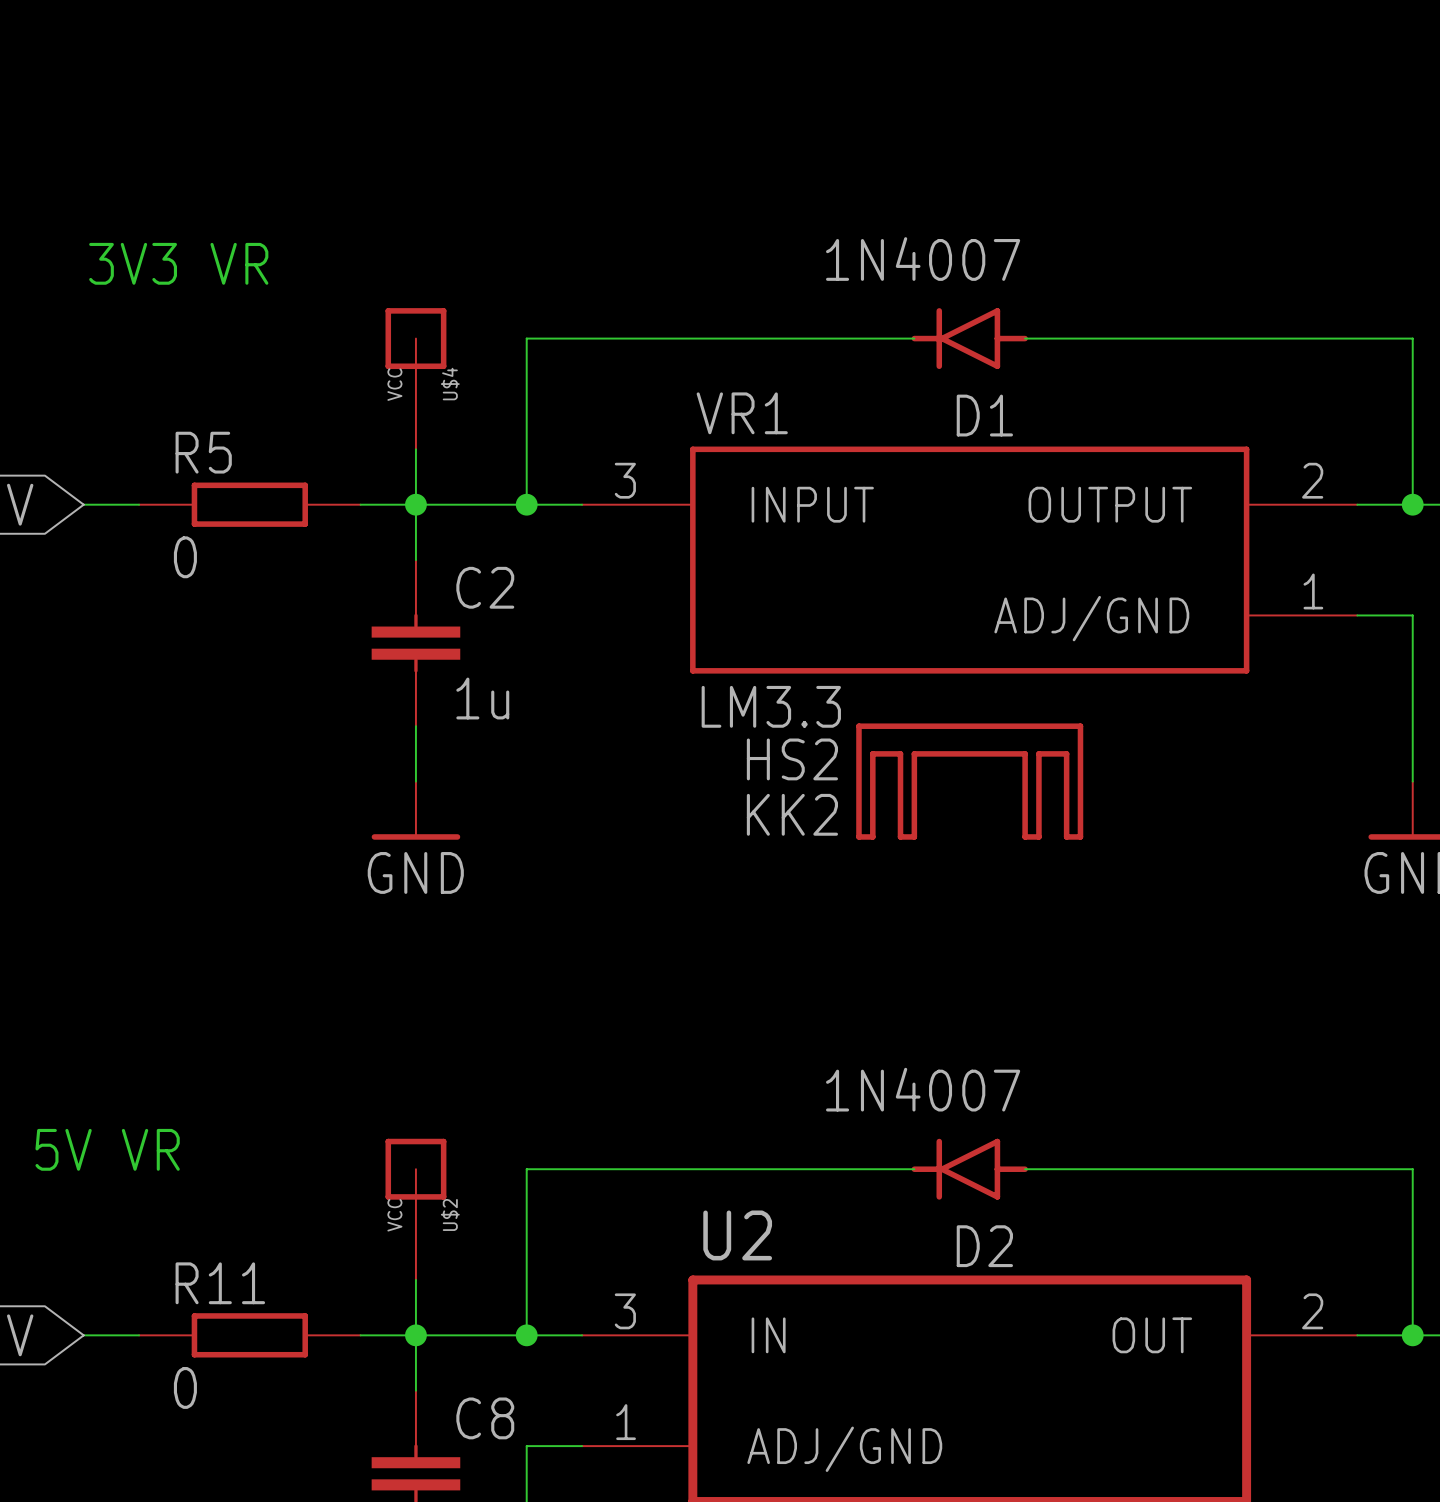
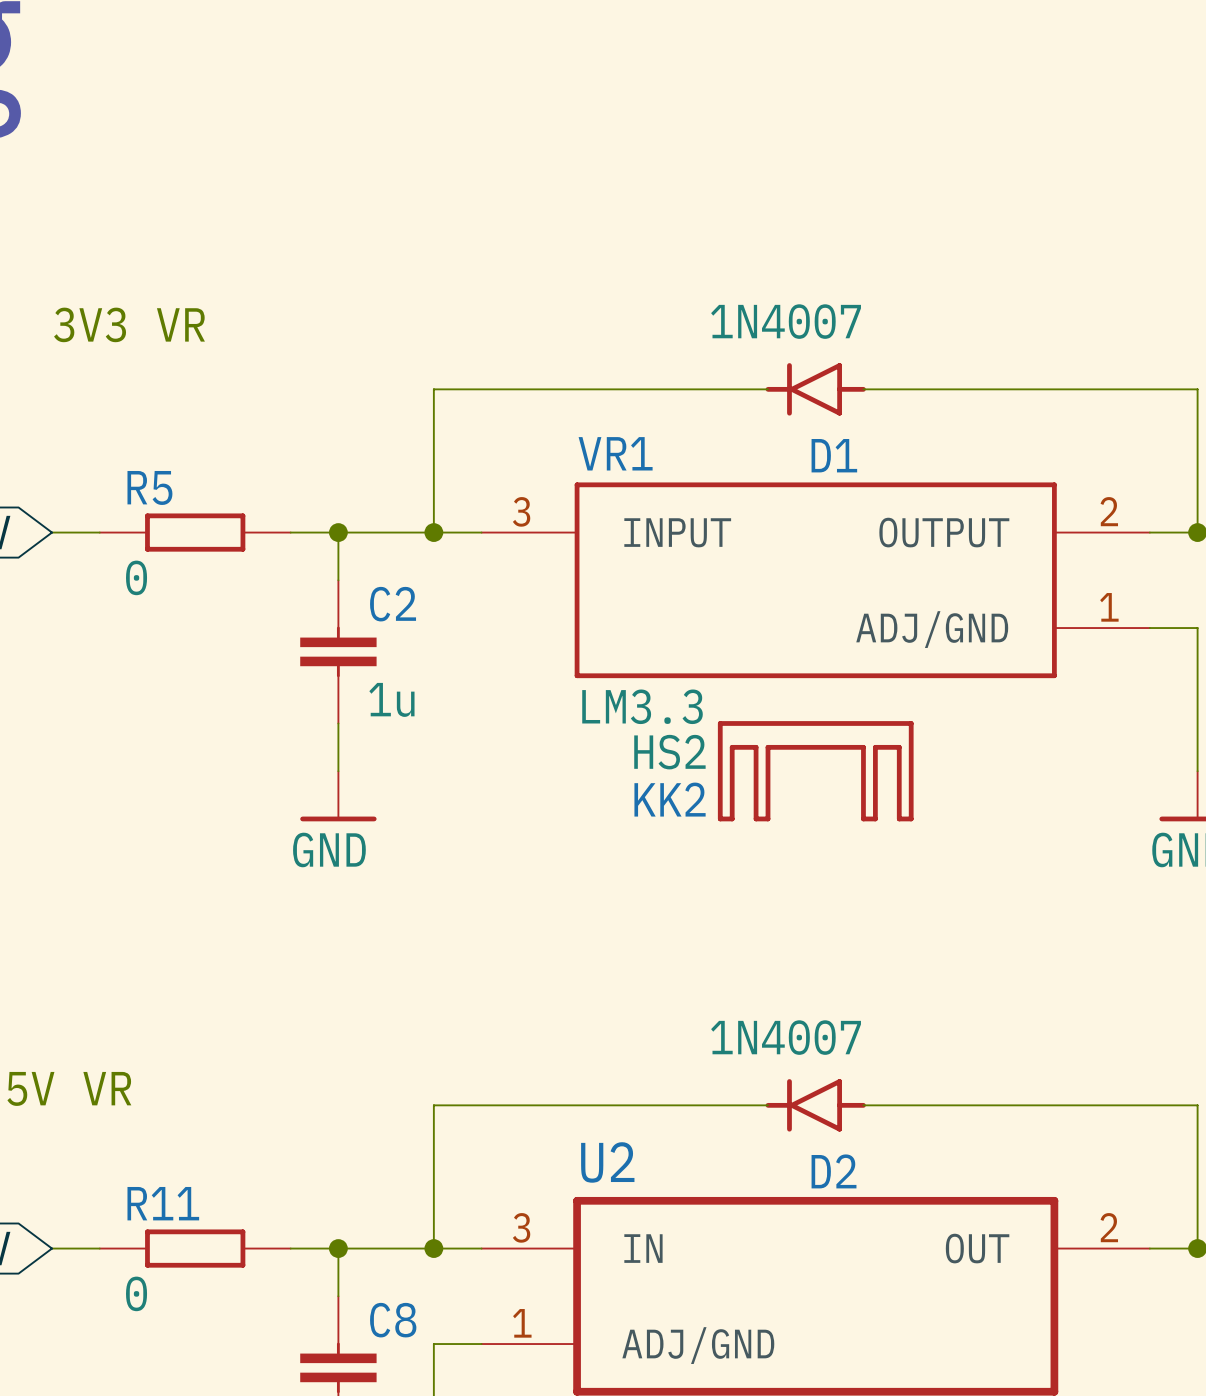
U$4: VCC (415, 378) -> none
wire: (415, 449) (415, 504) -> none
U$2: VCC (415, 1209) -> none
wire: (415, 1279) (415, 1335) -> none

